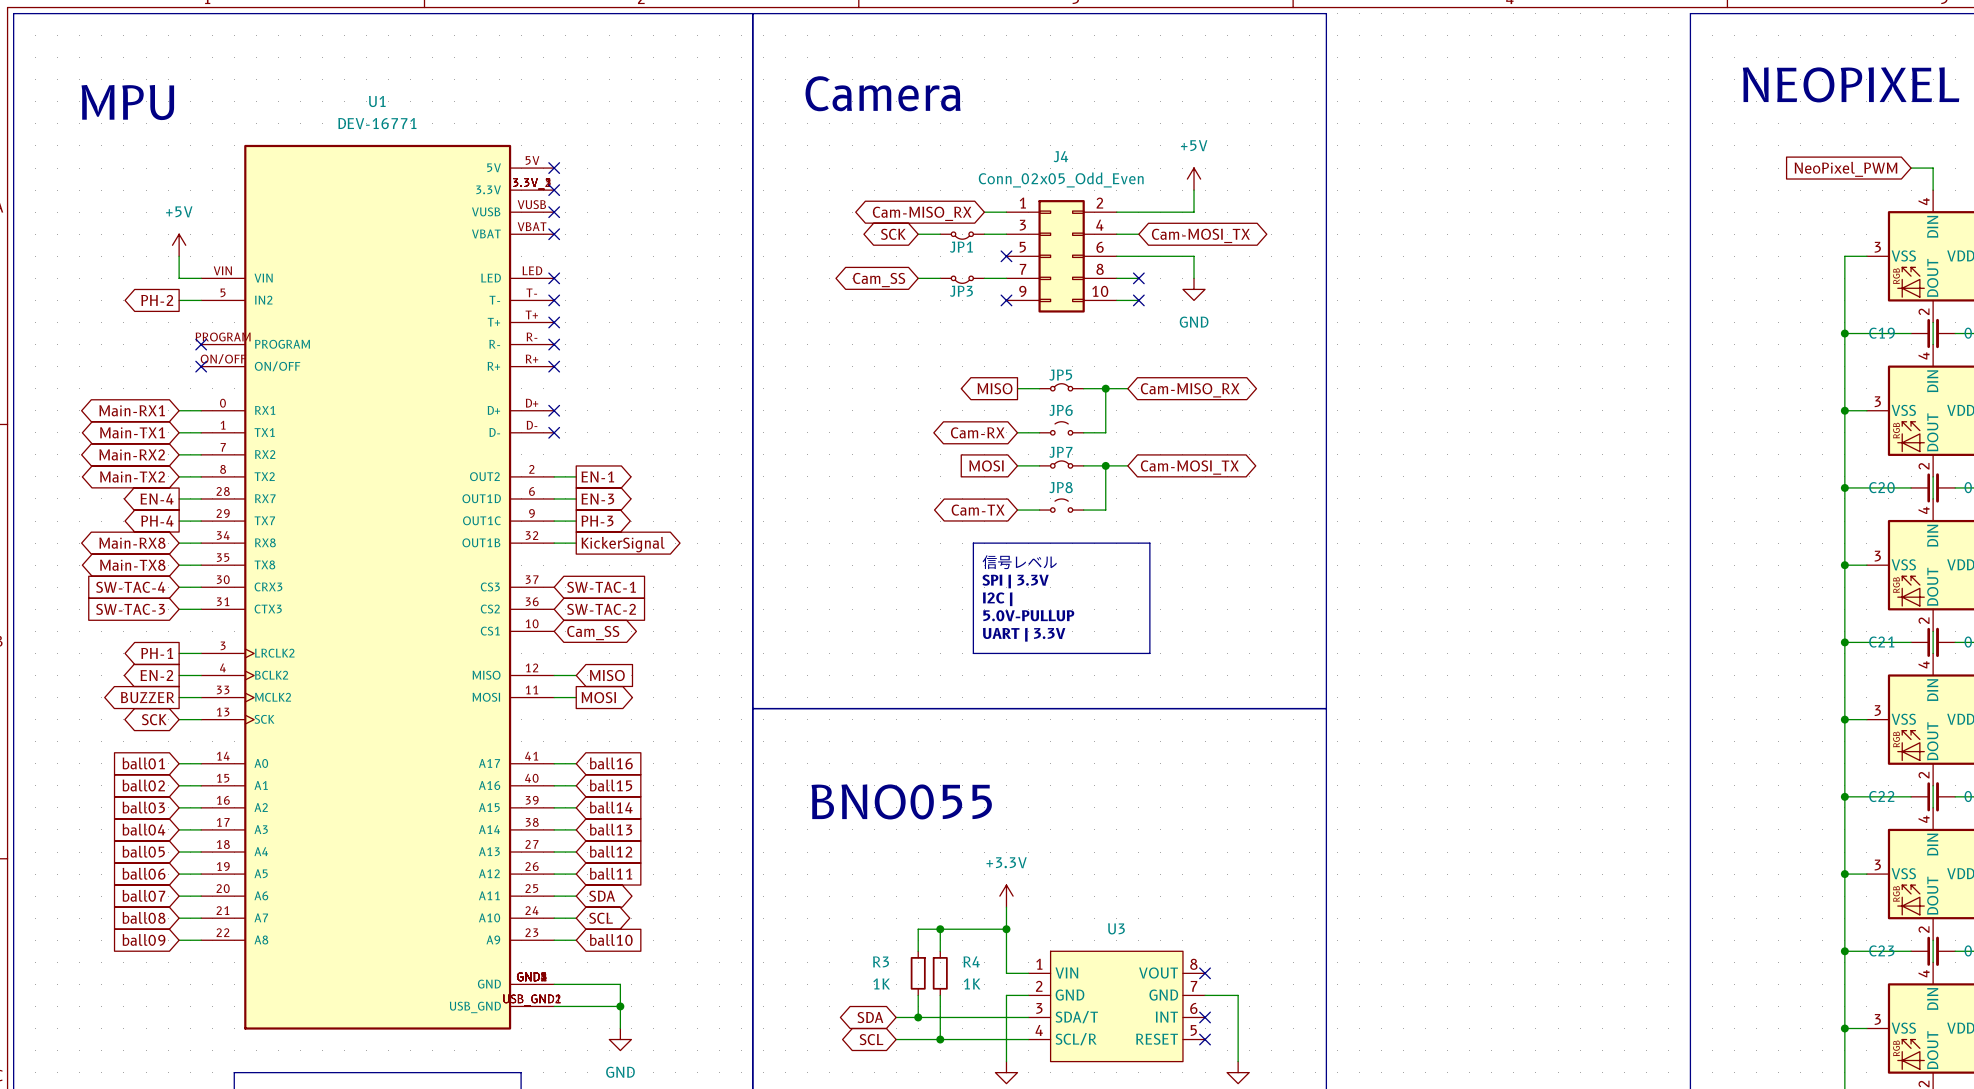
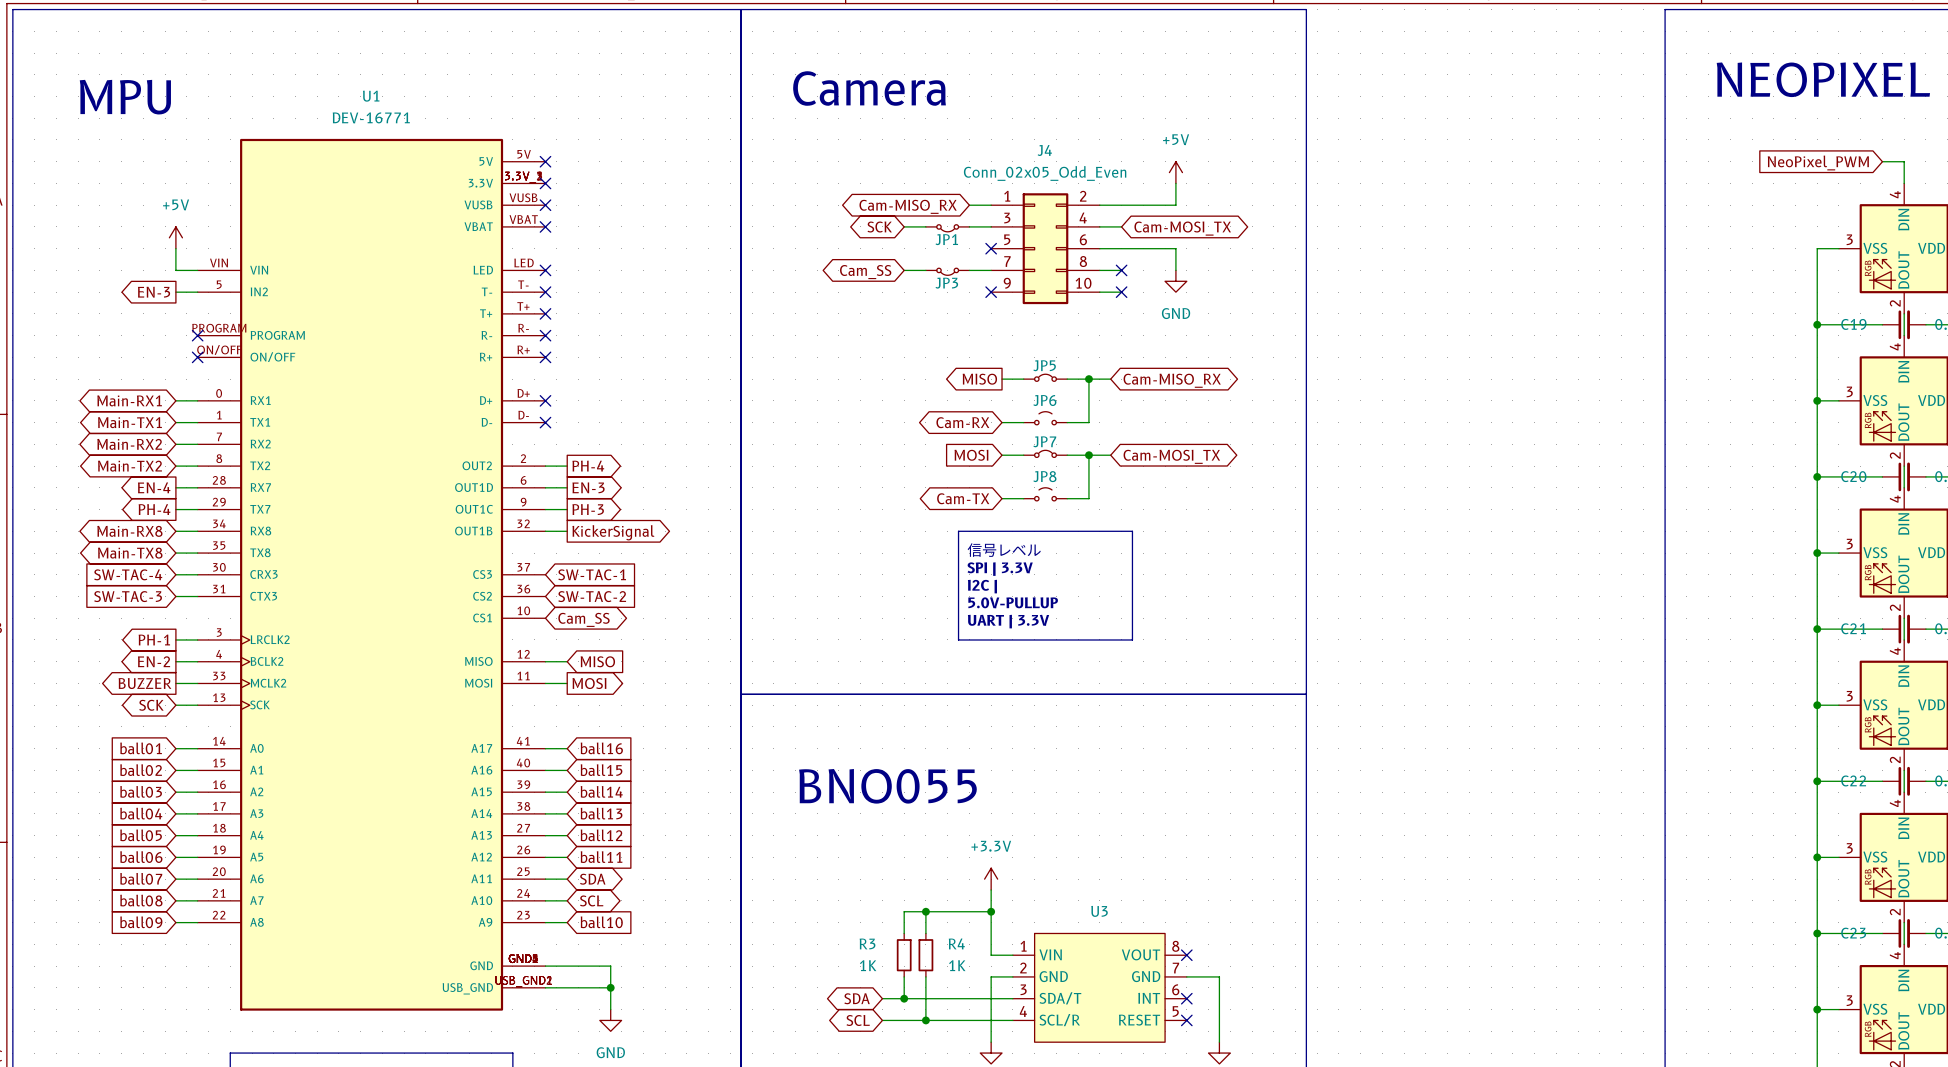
global label: PH-2 (157, 300) -> EN-3 (154, 292)
global label: EN-1 (597, 476) -> PH-4 (588, 466)

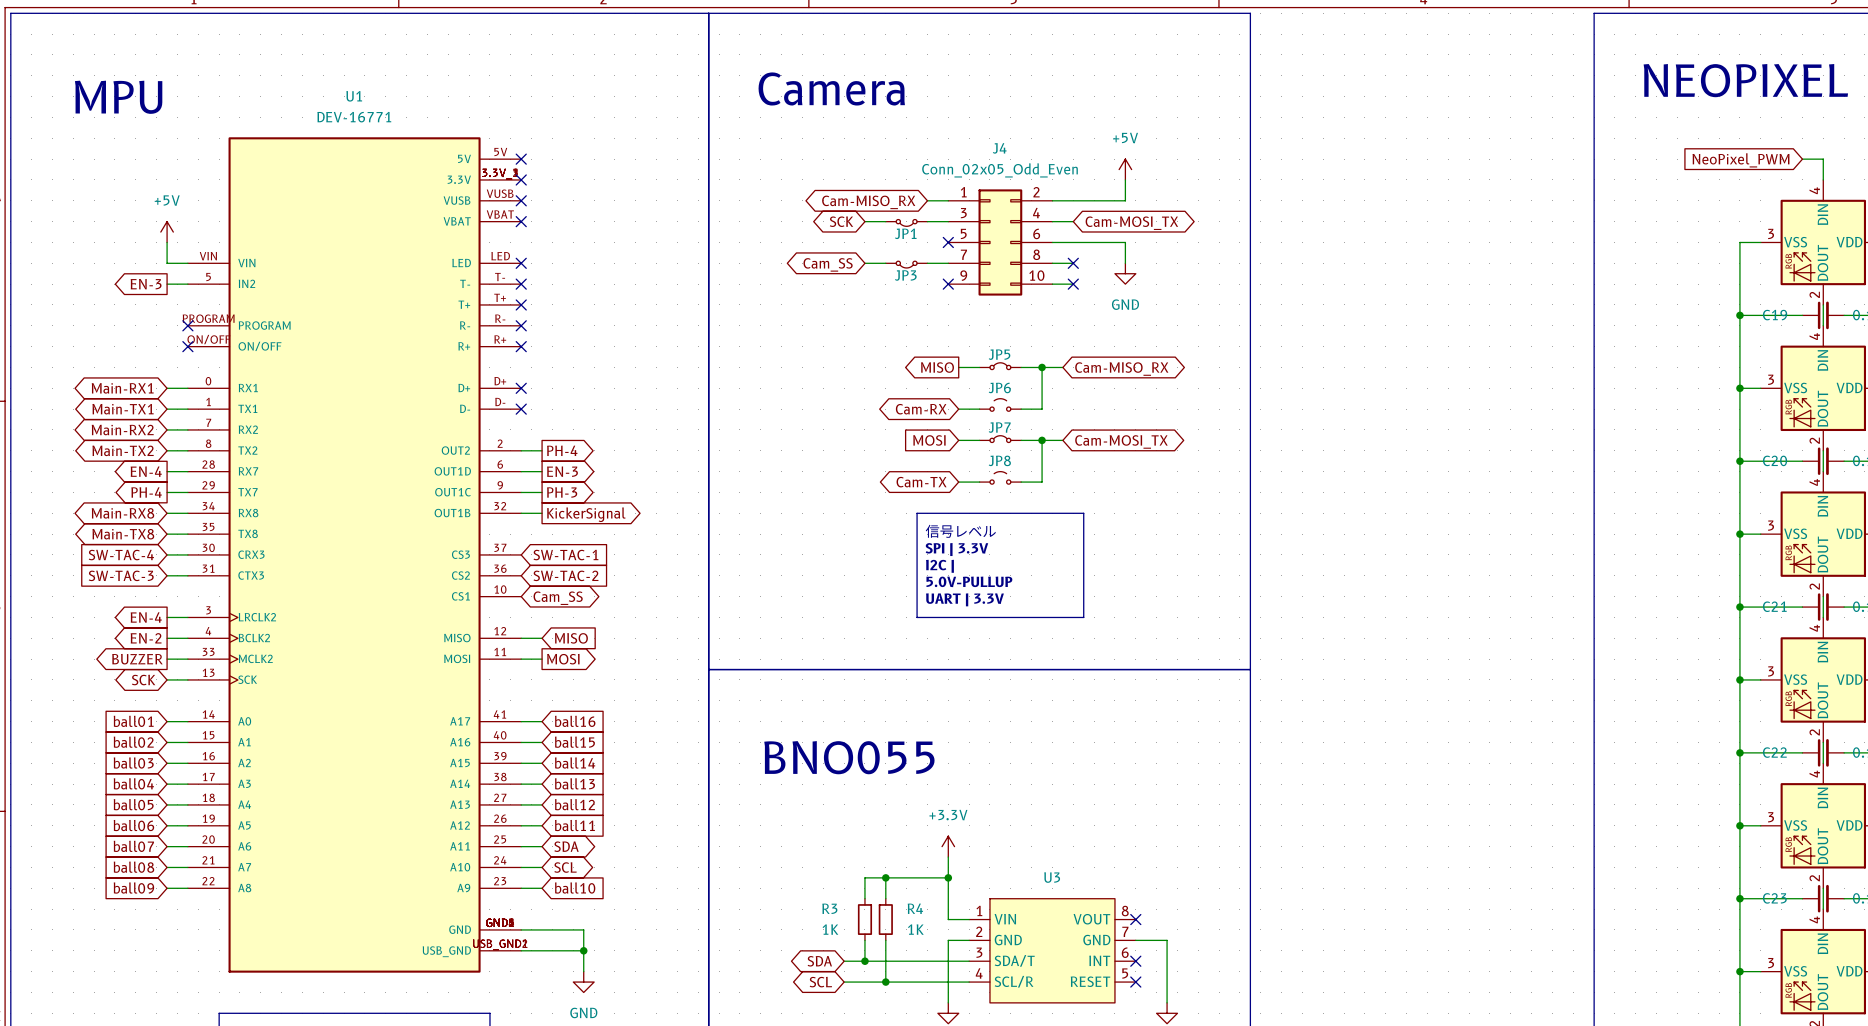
global label: PH-1 (154, 639) -> EN-4 (146, 617)

